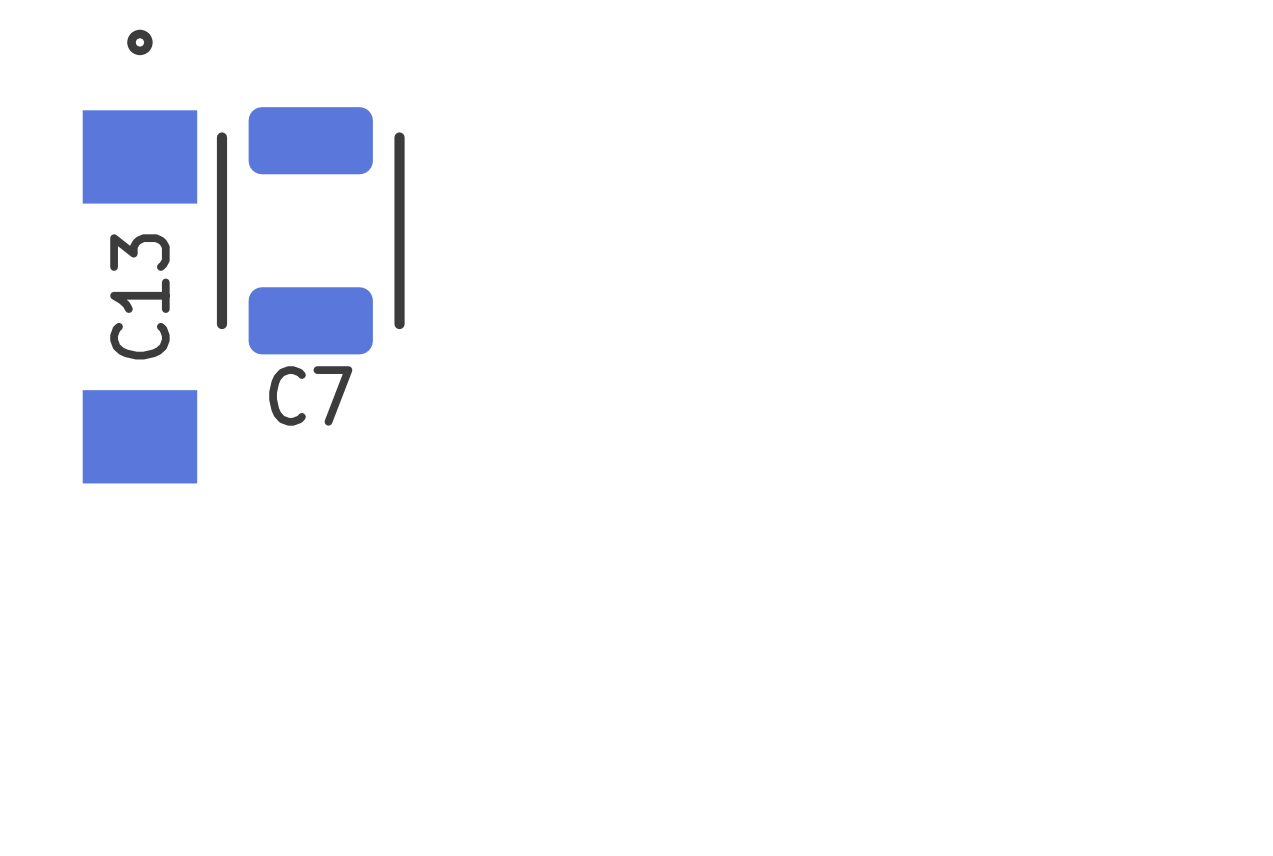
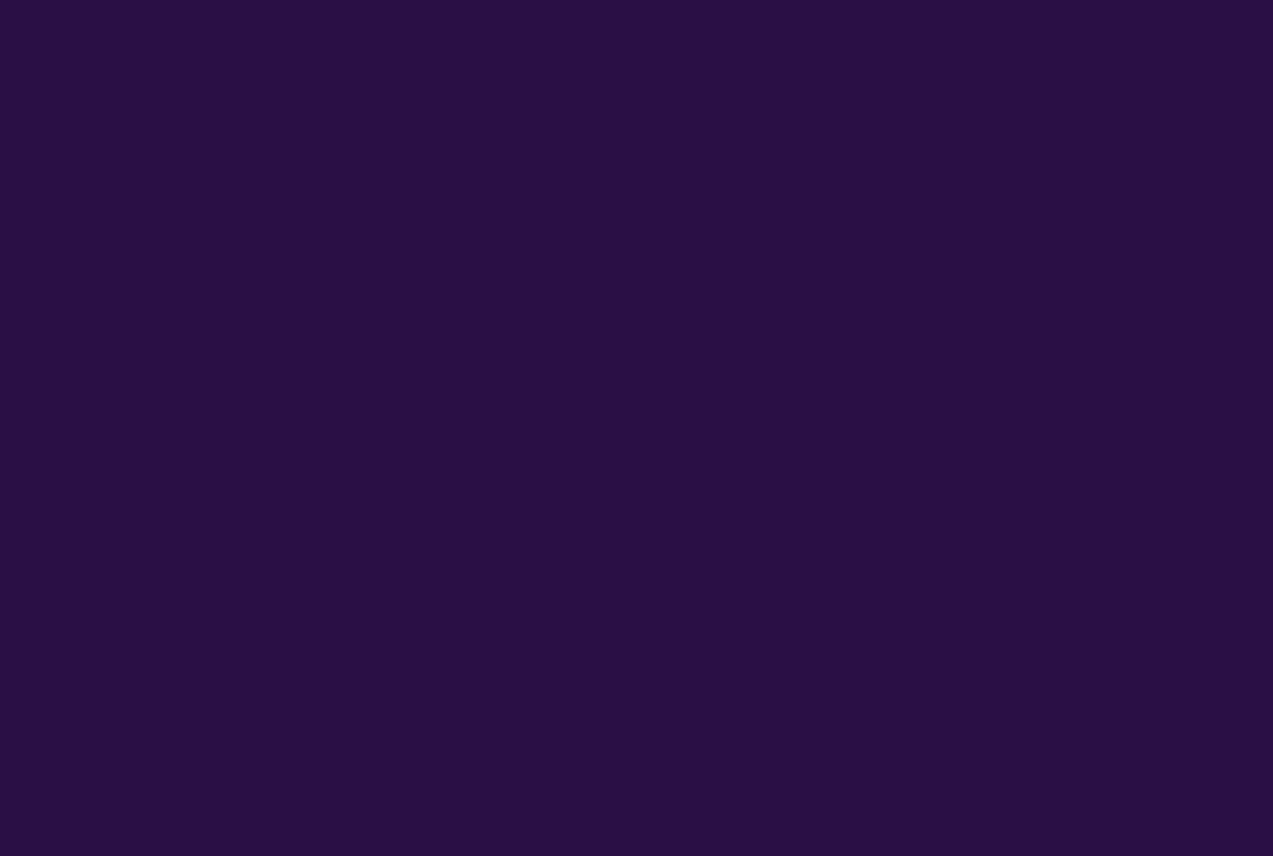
C7: (310, 230) -> none
C13: (139, 256) -> none

